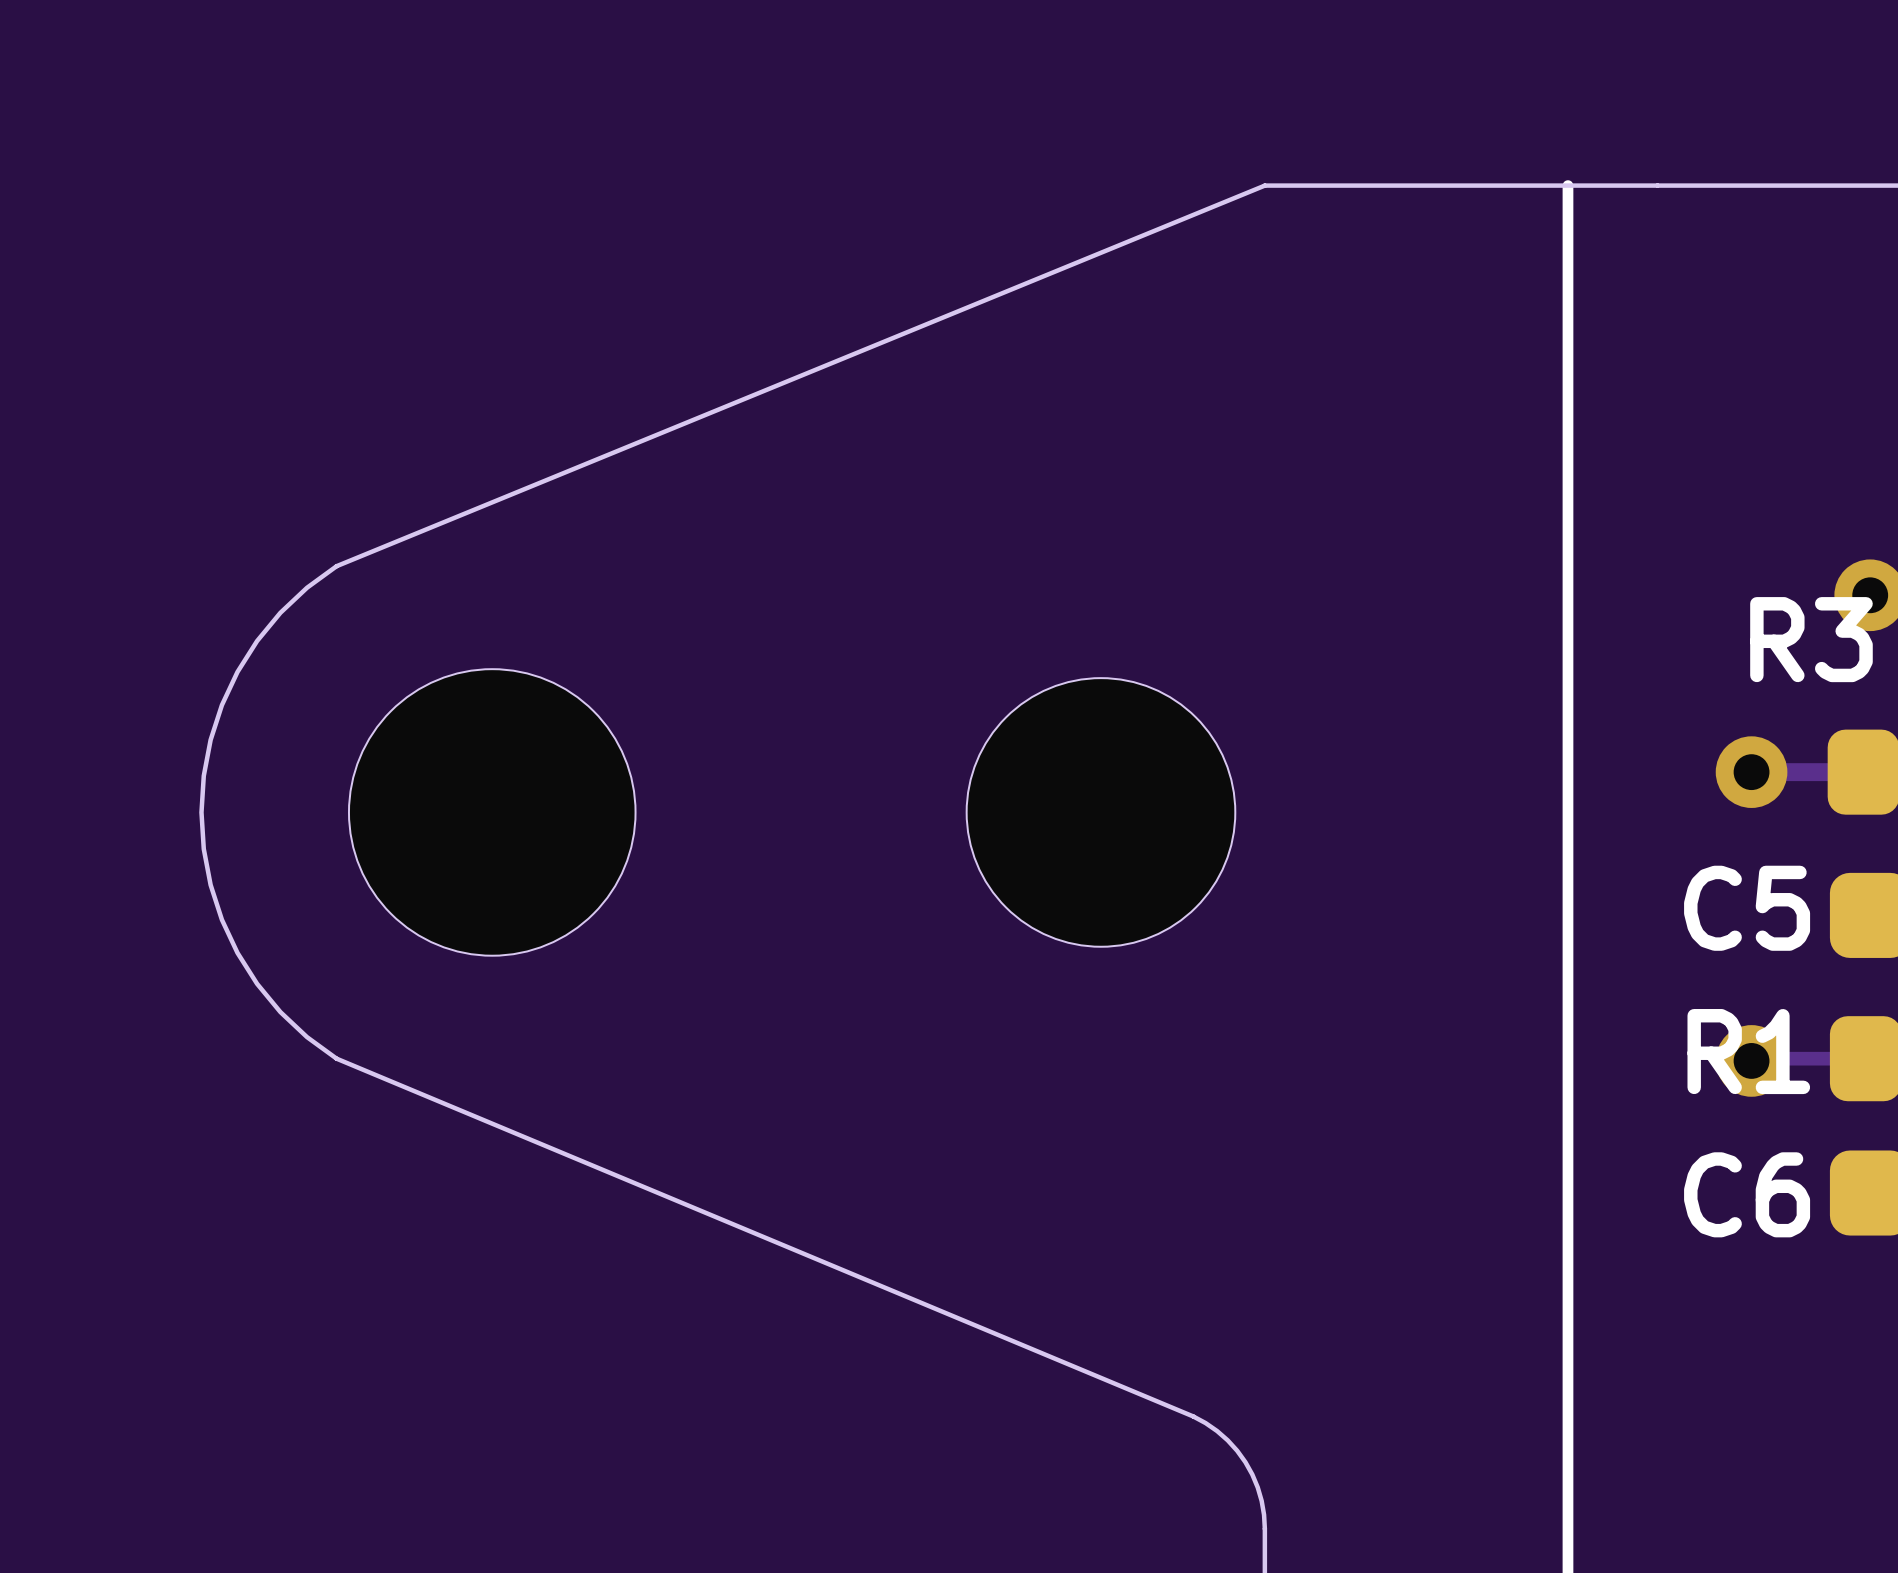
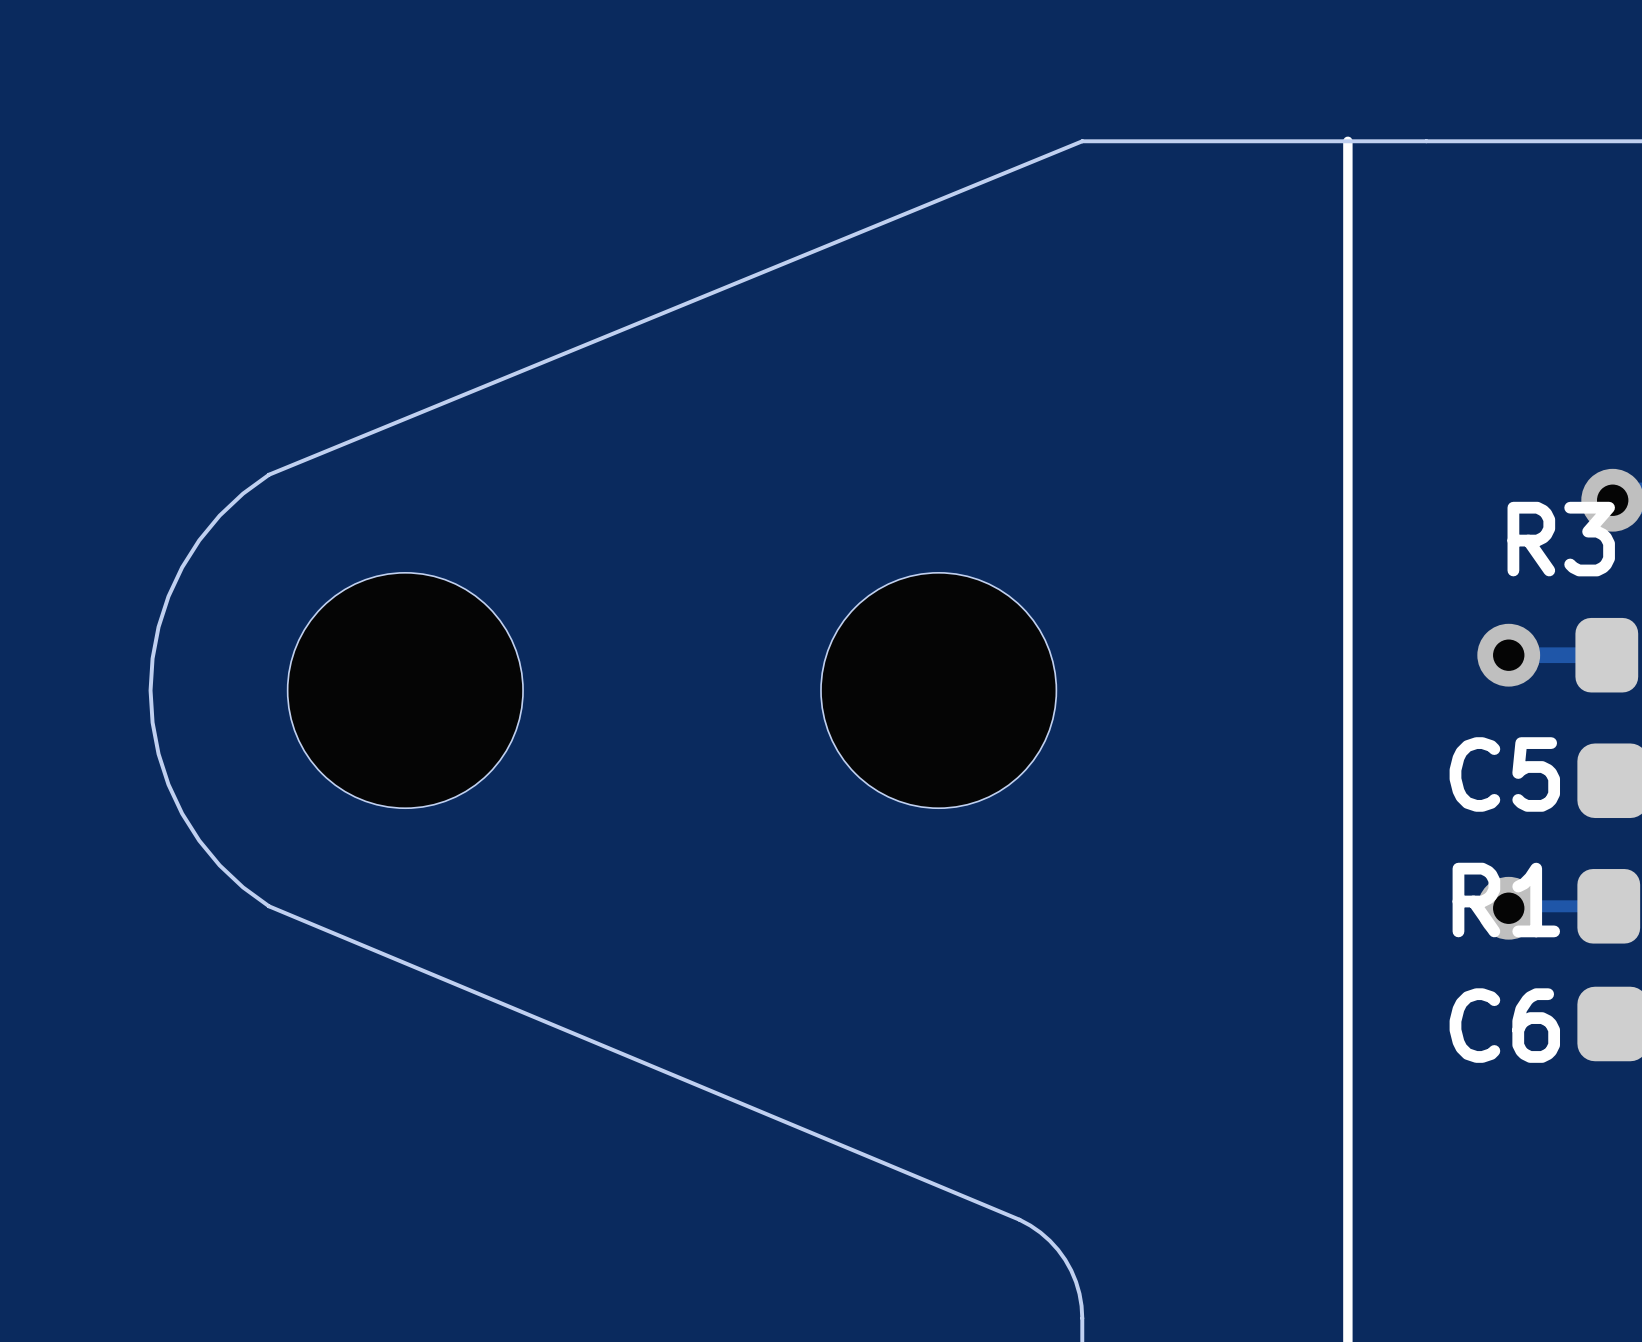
part footprint: [348, 669, 636, 956] -> [287, 572, 524, 809]

